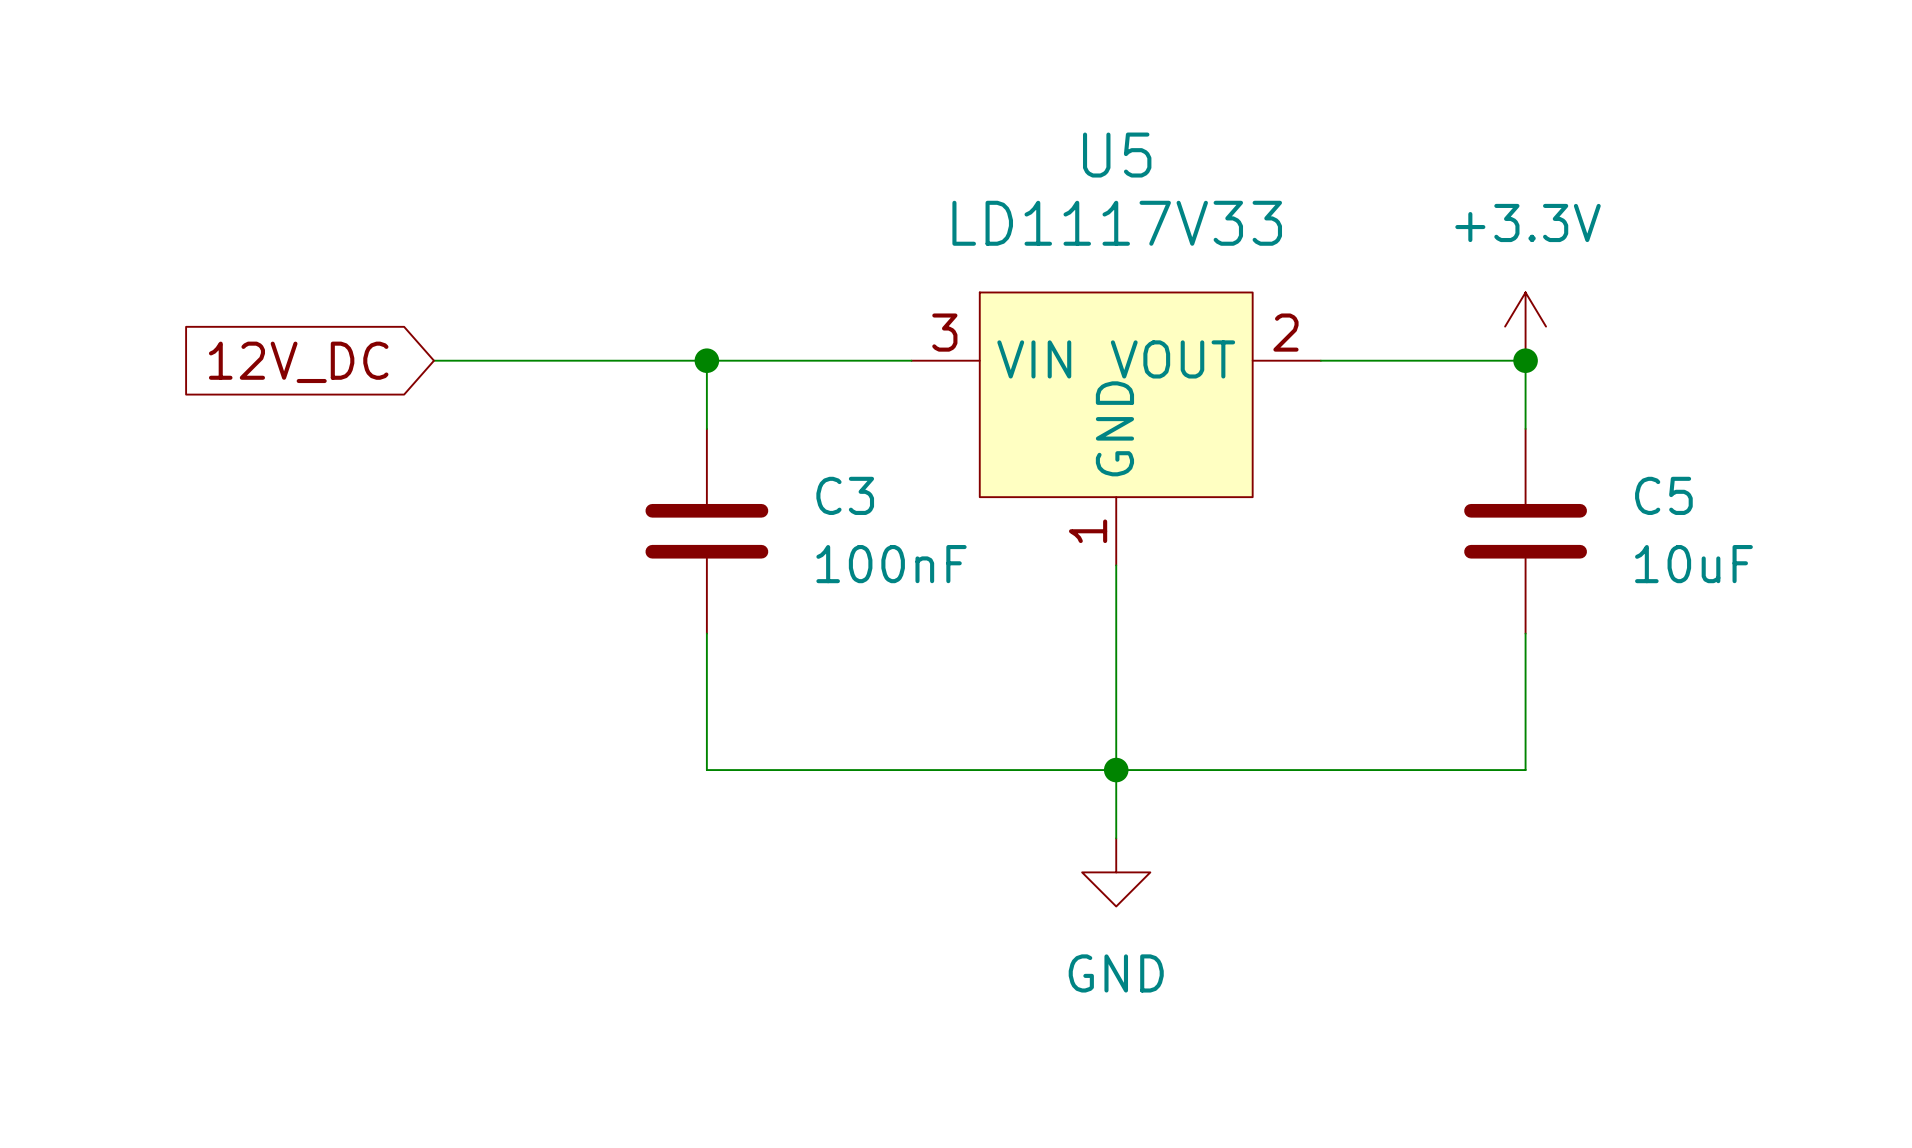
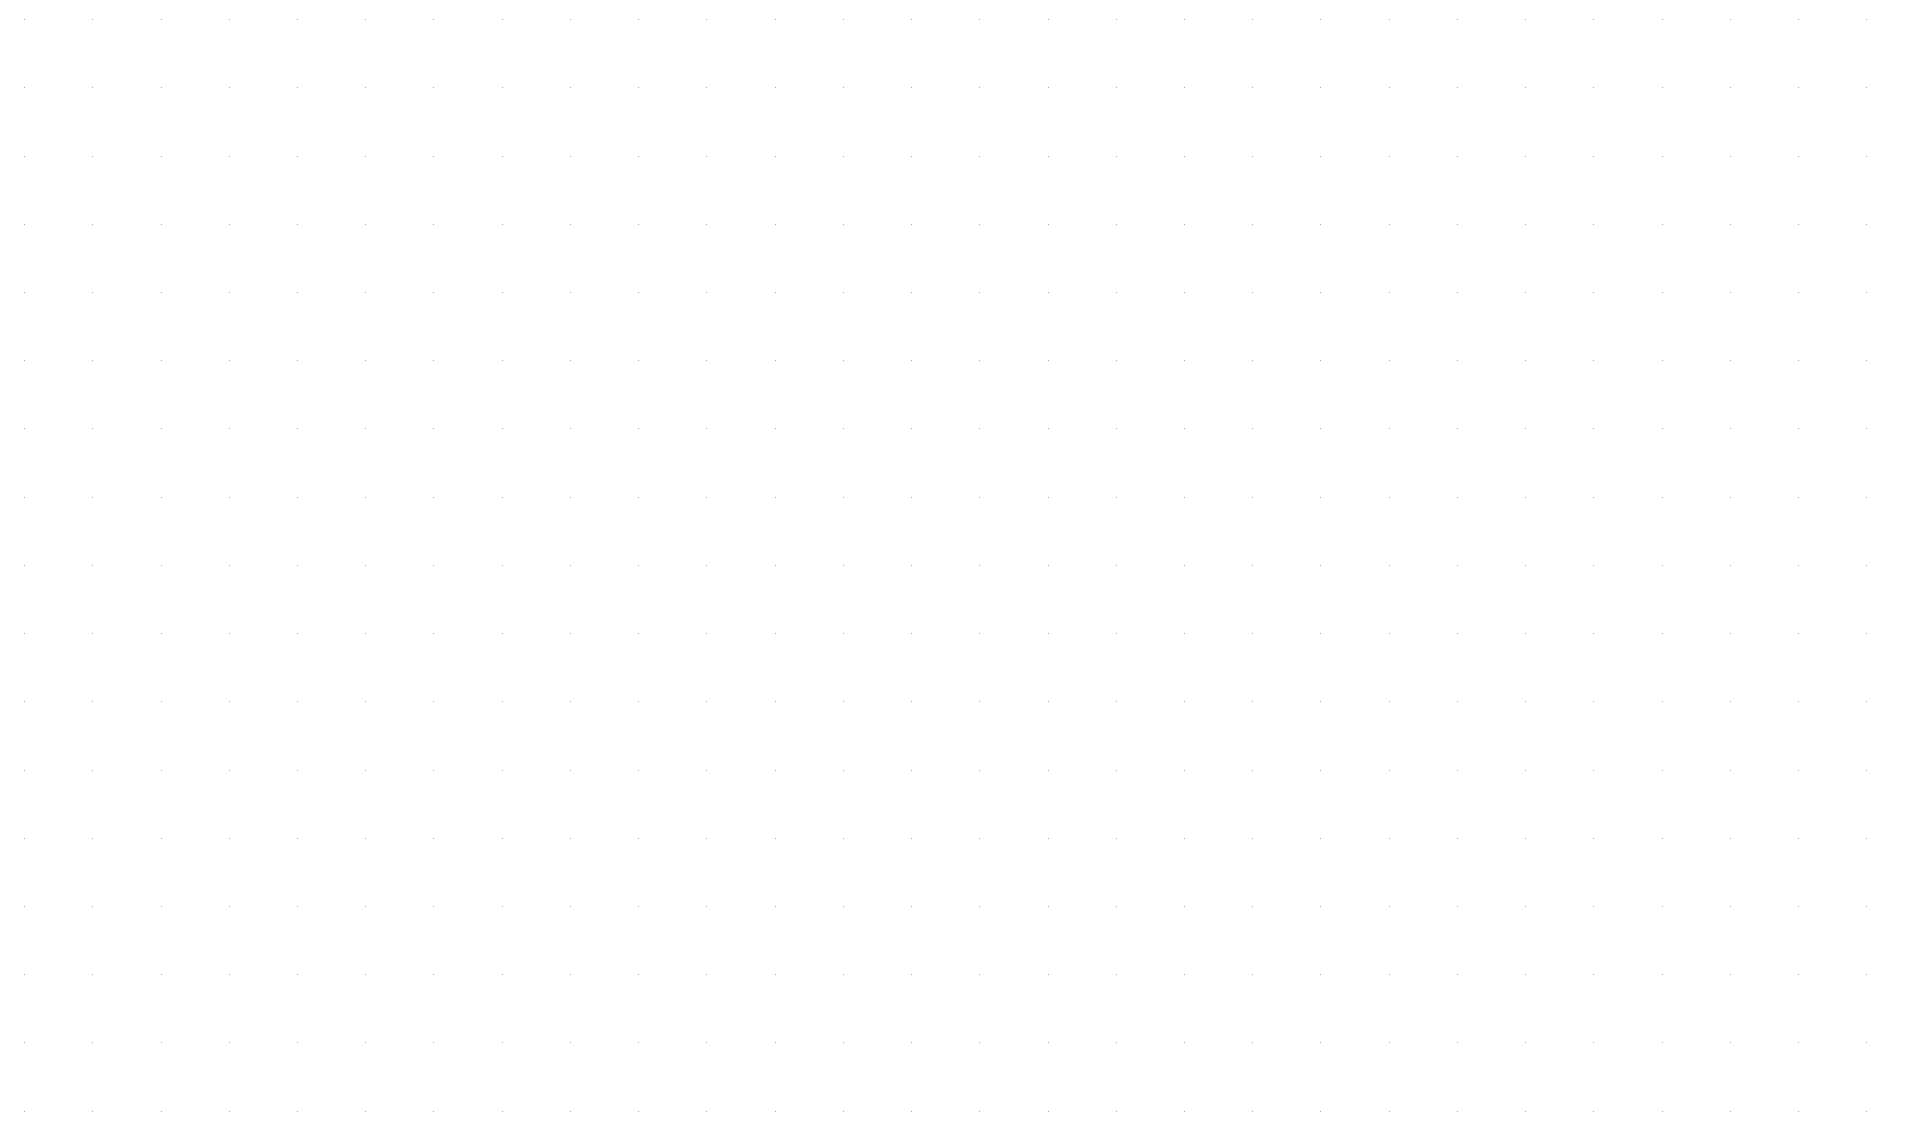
power symbol: +3.3V (1525, 326) -> none
wire: (433, 360) (911, 360) -> none
wire: (706, 360) (706, 428) -> none
junction: (706, 360) -> none
wire: (1320, 360) (1525, 360) (1525, 428) -> none
junction: (1525, 360) -> none
global label: 12V_DC (298, 362) -> none
U5: LD1117V33 (1116, 428) -> none
C3: 100nF (706, 531) -> none
C5: 10uF (1525, 531) -> none
wire: (1116, 565) (1116, 838) -> none
wire: (706, 633) (706, 770) (1525, 770) (1525, 633) -> none
junction: (1116, 770) -> none
power symbol: GND (1116, 872) -> none

